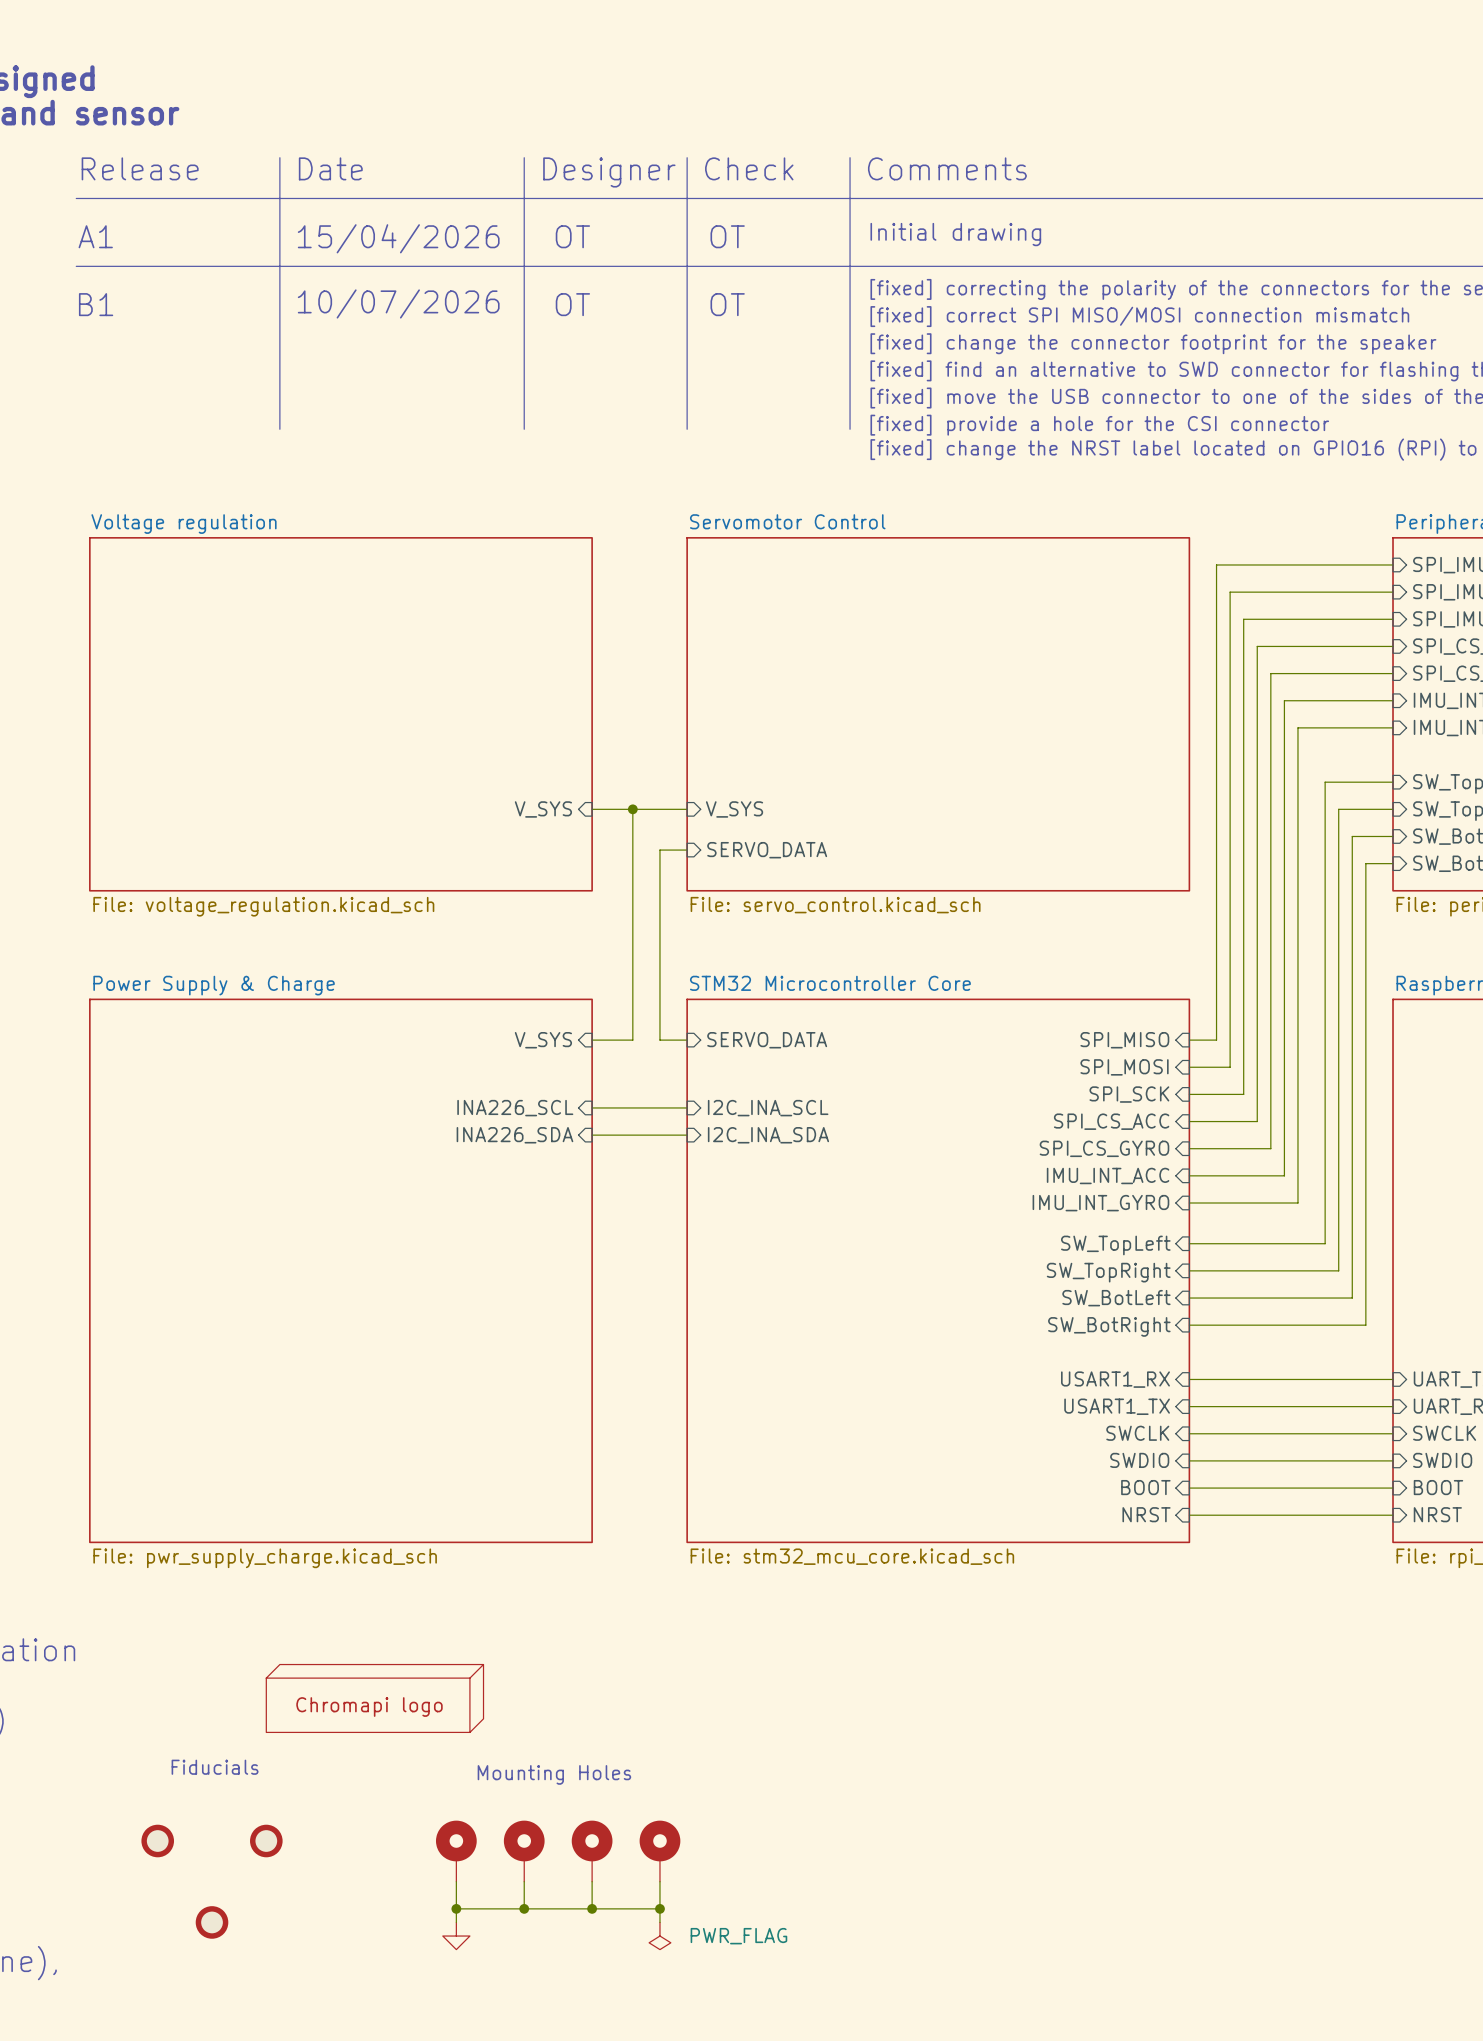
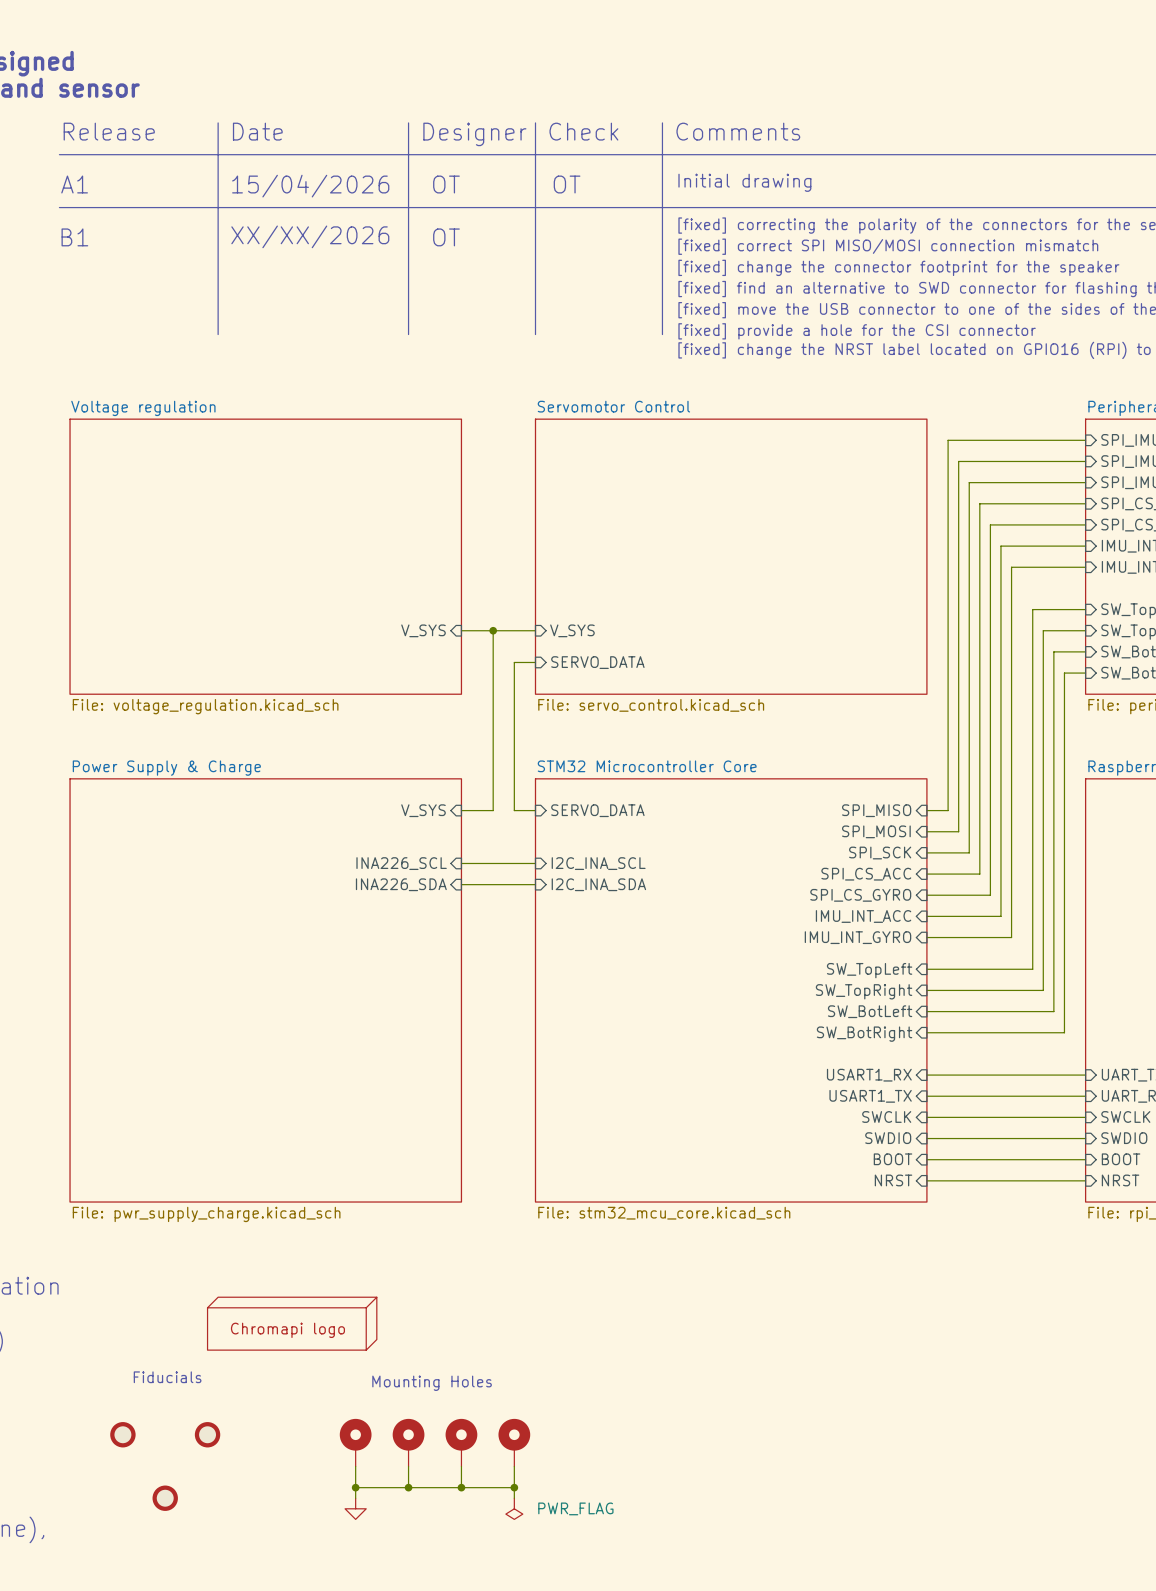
text: 10/07/2026 (398, 303) -> XX/XX/2026 (310, 236)
text: OT (727, 304) -> none

